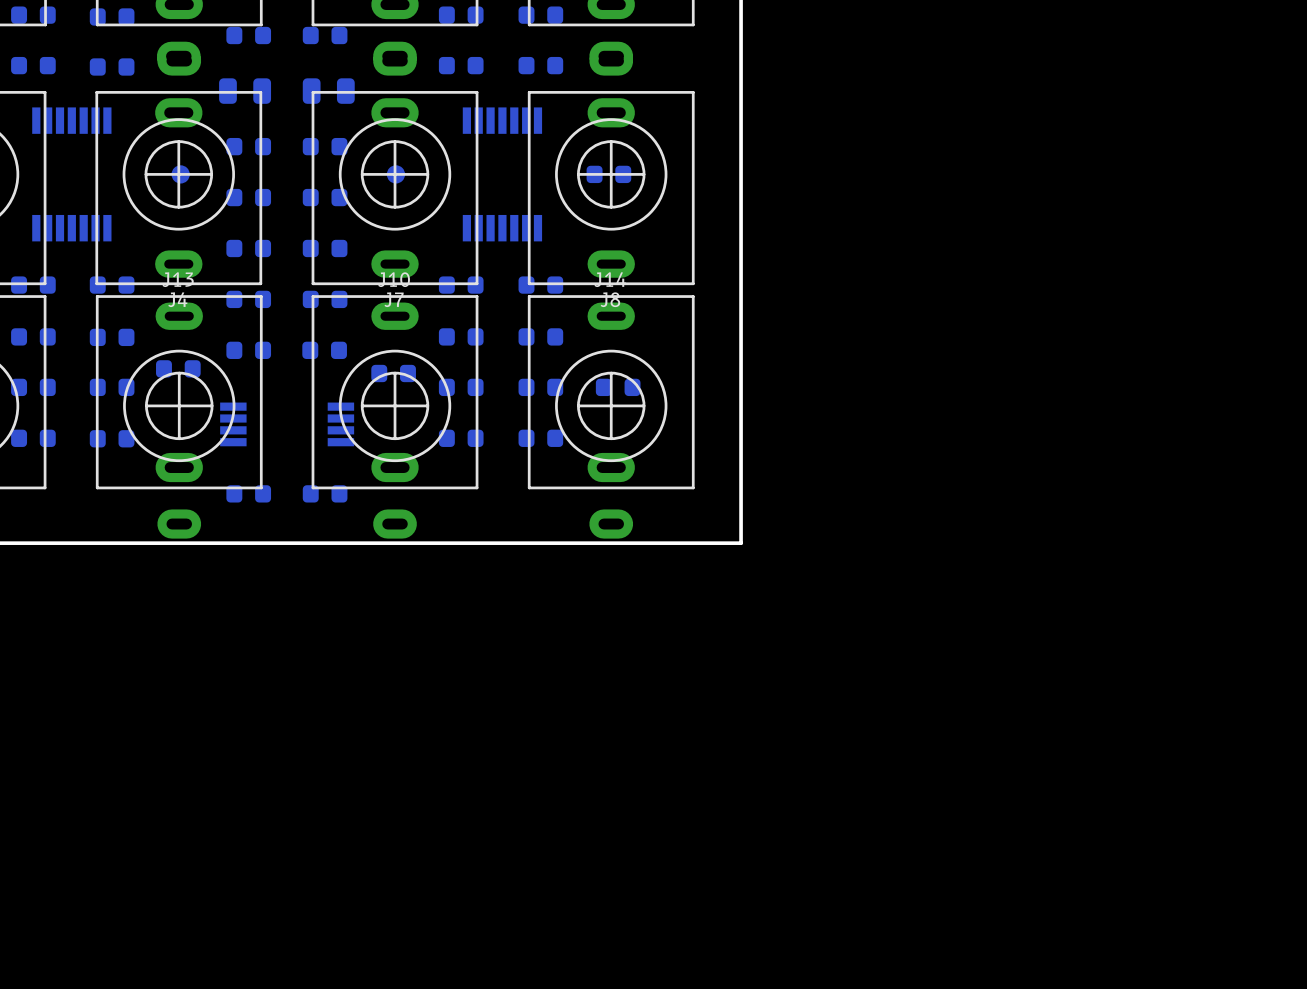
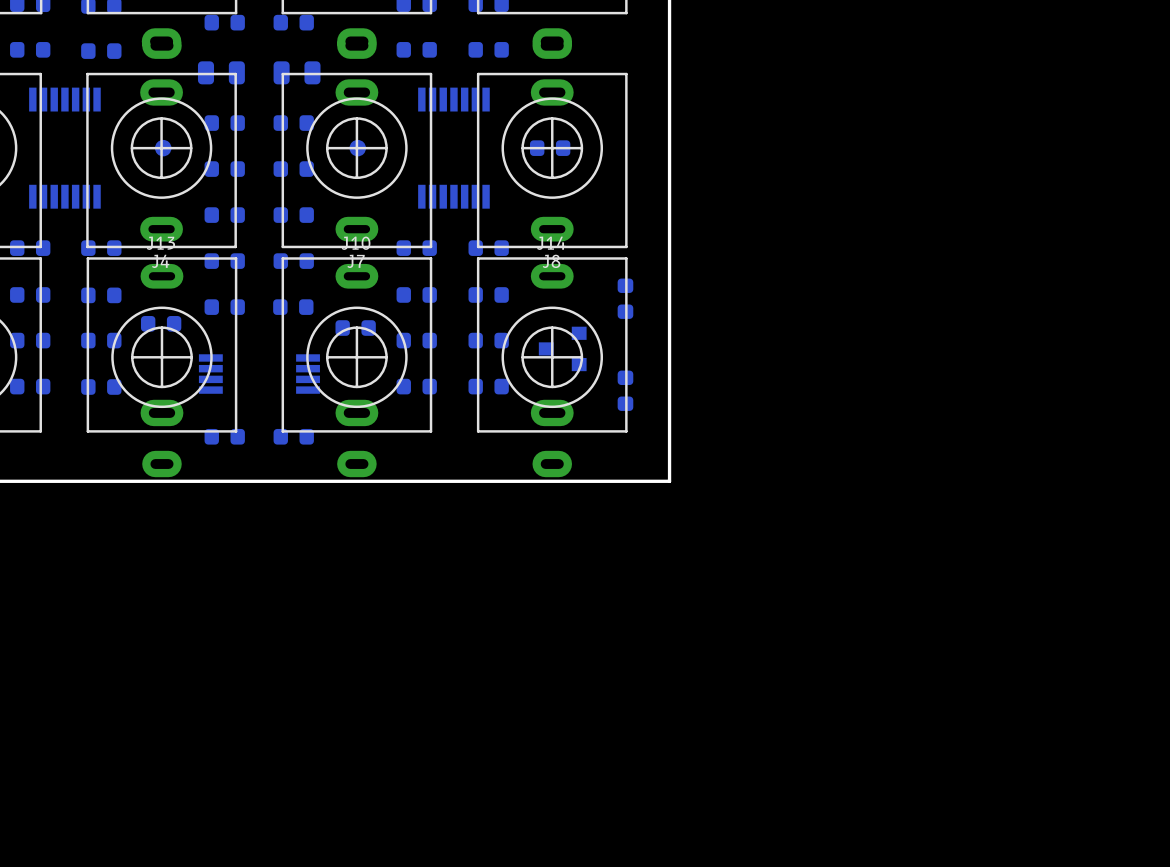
part: none -> (625, 298)
part footprint: [595, 378, 641, 397] -> [538, 326, 587, 372]
part: none -> (625, 390)

